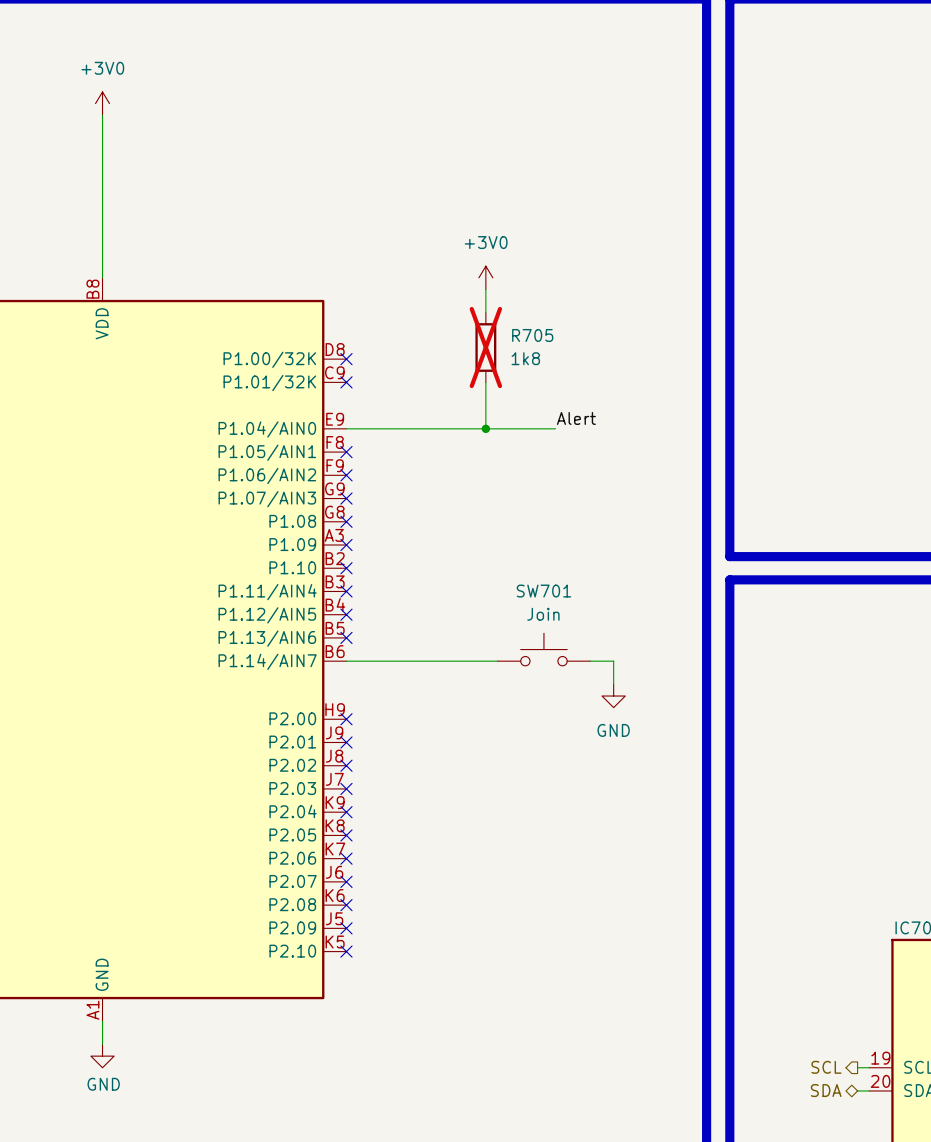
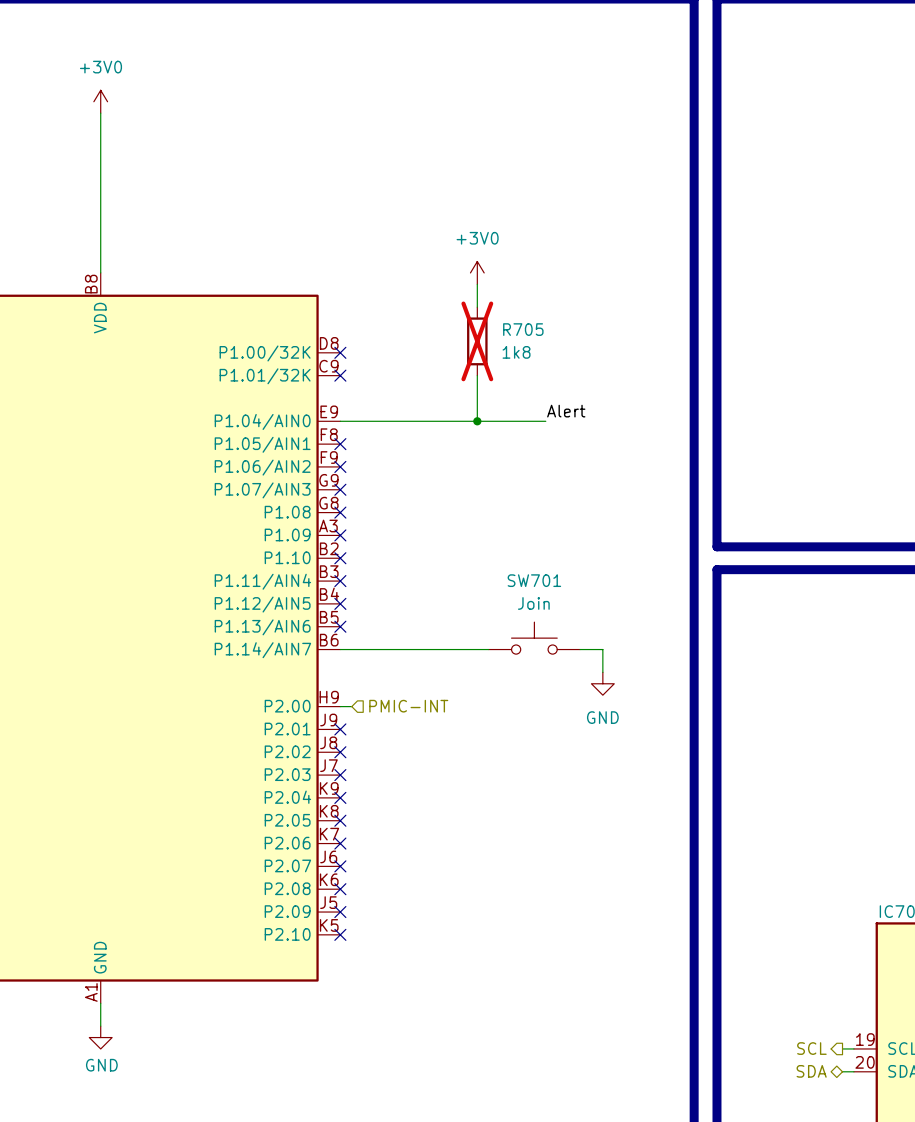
hierarchical label: none -> PMIC-INT (408, 706)
wire: none -> (340, 706) (351, 706)
no-connect mark: (346, 719) -> none

